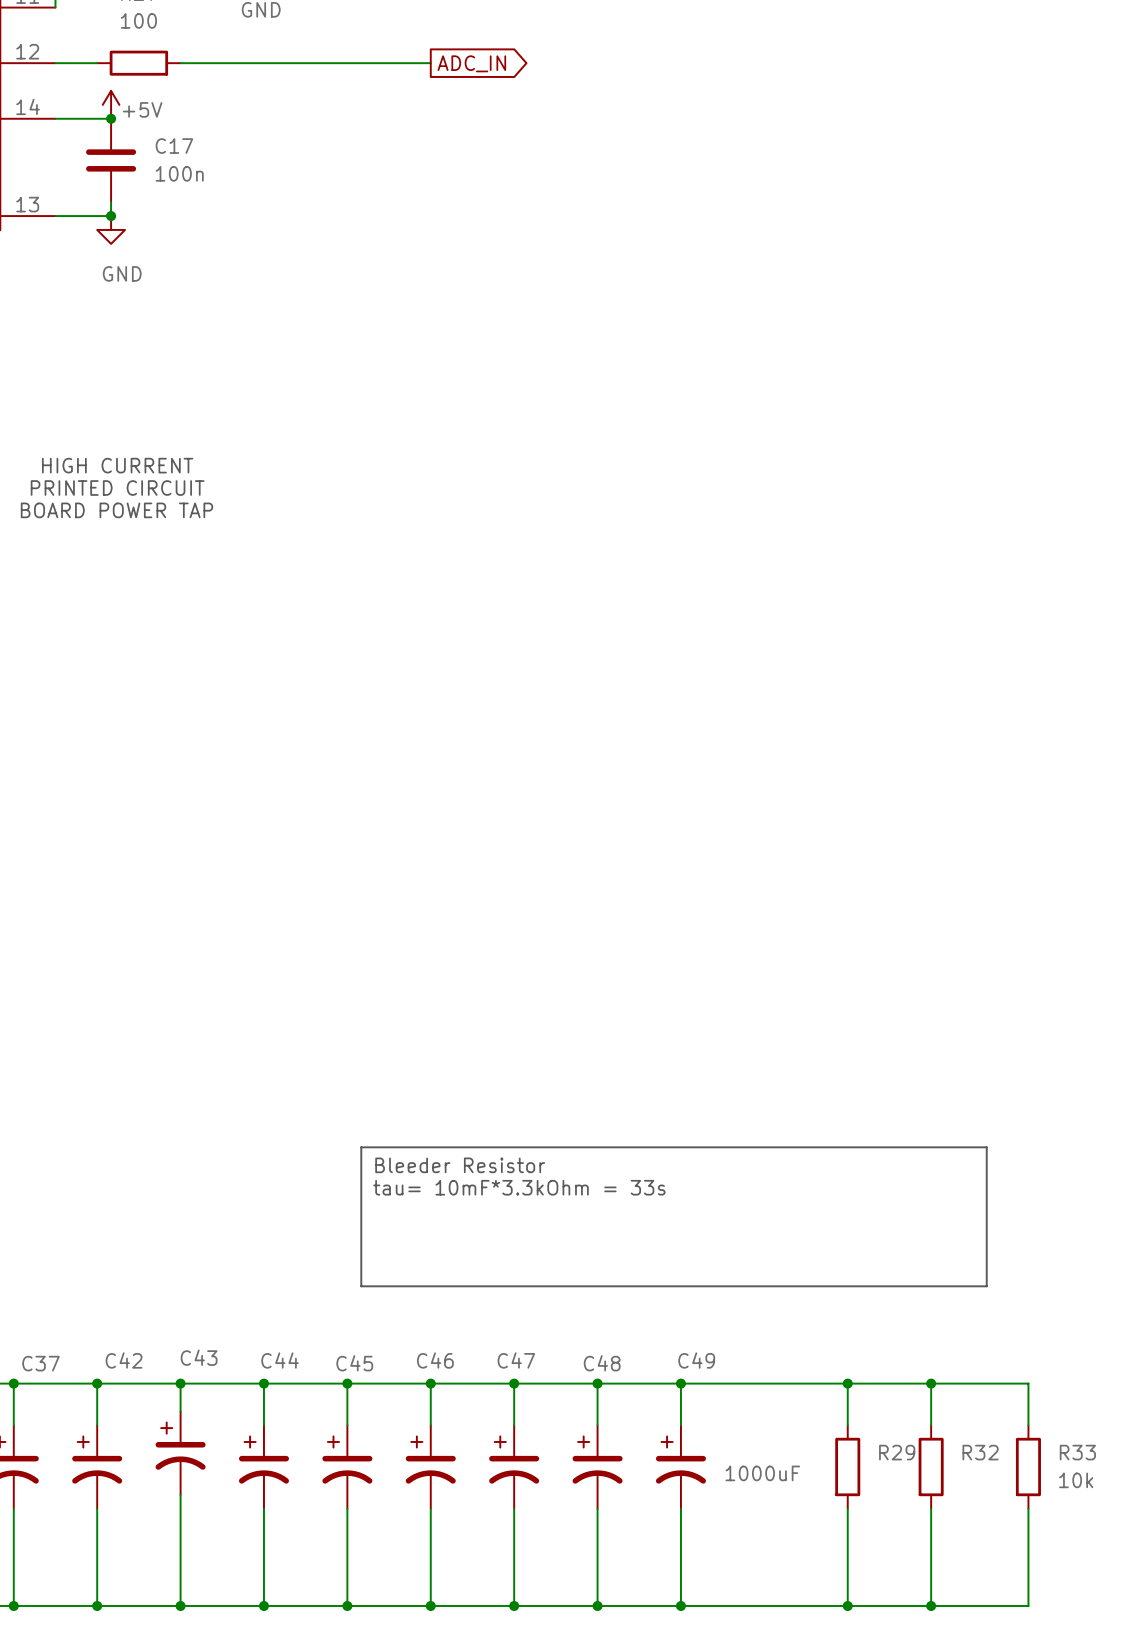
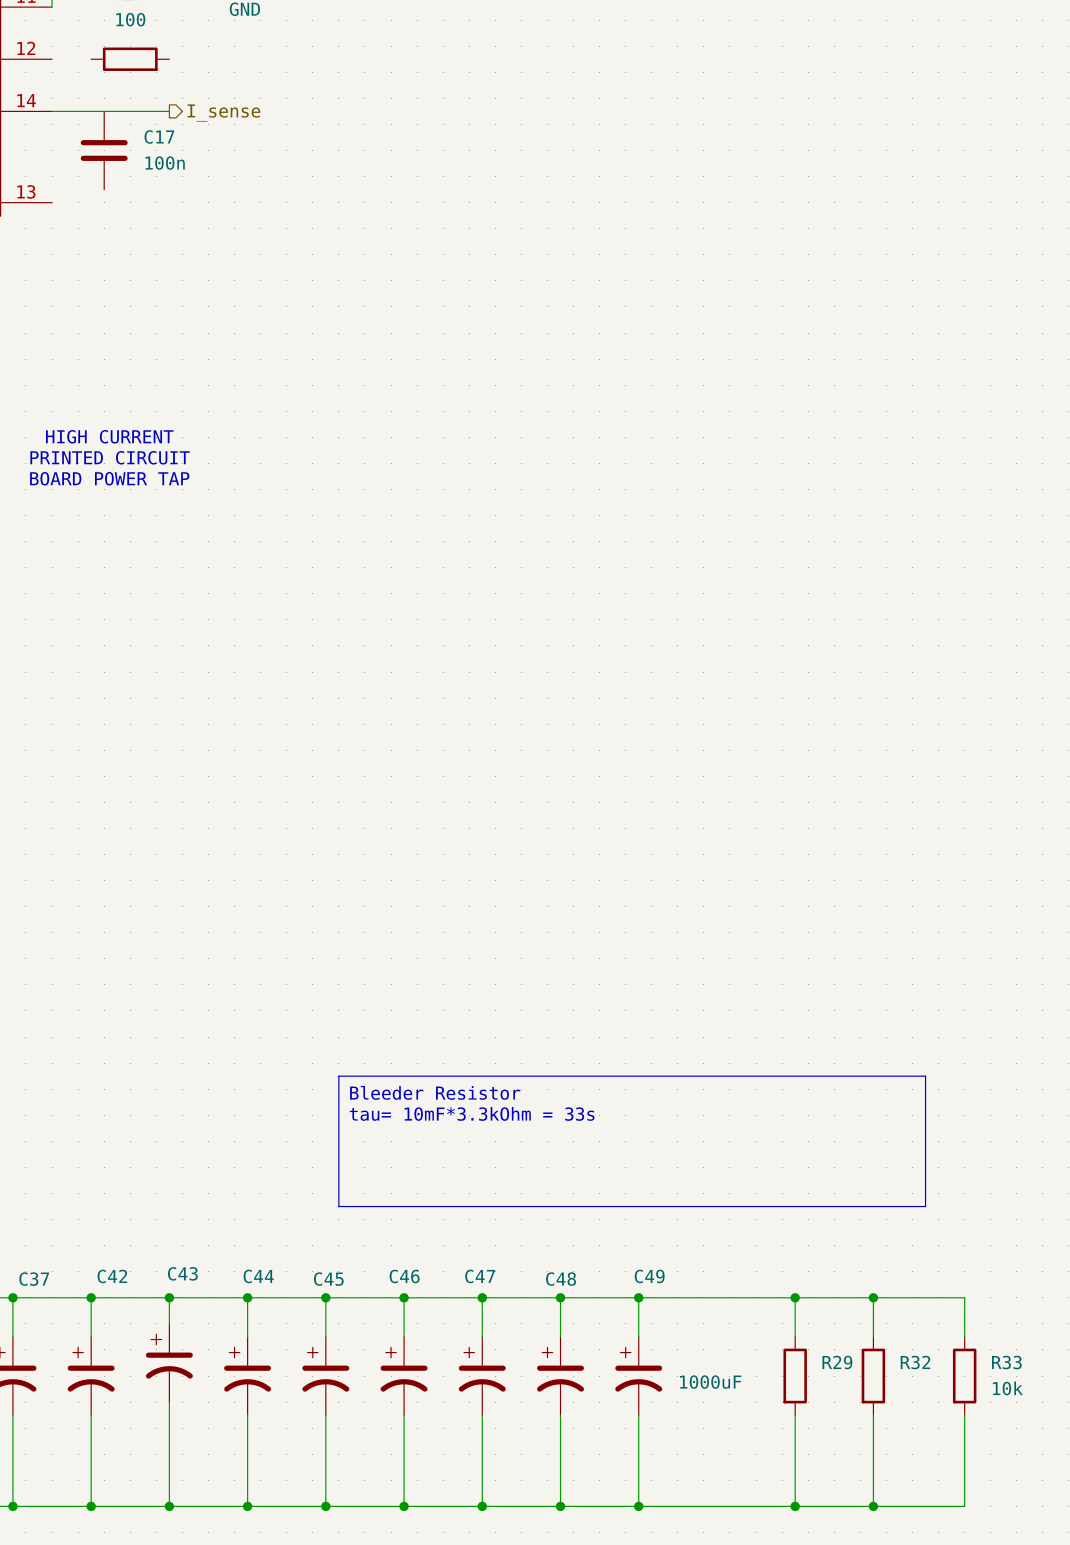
wire: (55, 63) (97, 63) -> none
wire: (180, 63) (430, 63) -> none
global label: ADC_IN (471, 63) -> none
power symbol: +5V (111, 104) -> none
wire: none -> (104, 111) (169, 111)
junction: (111, 118) -> none
hierarchical label: none -> I_sense (223, 113)
wire: (111, 202) (111, 216) (55, 216) -> none
junction: (111, 216) -> none
power symbol: GND (111, 229) -> none

